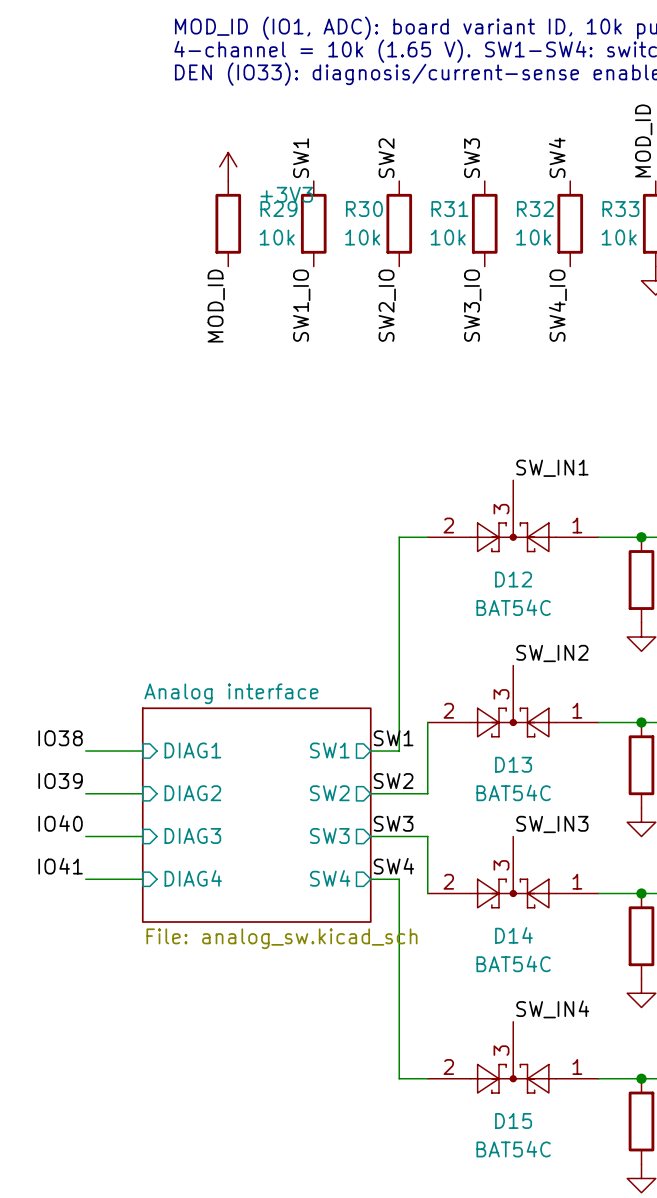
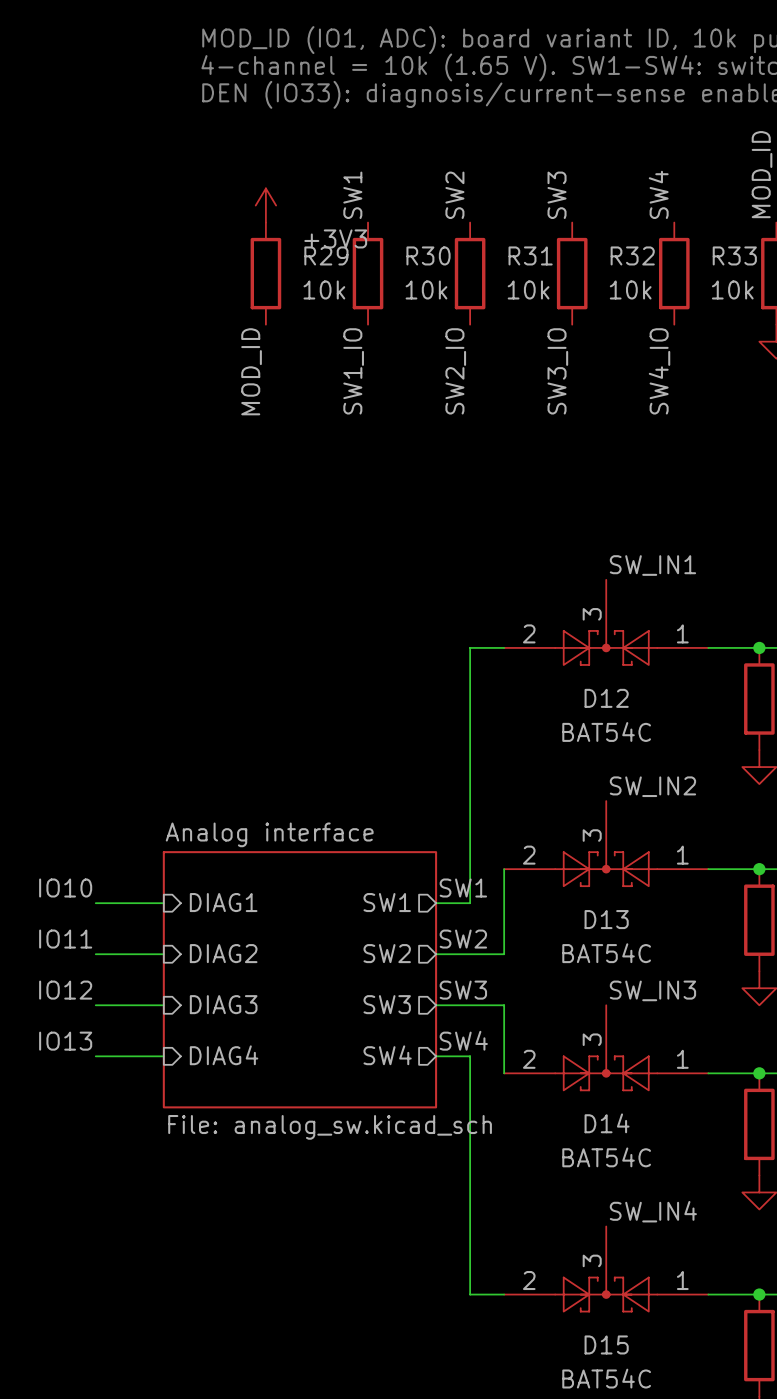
label: IO38 (60, 738) -> IO10 (65, 888)
label: IO39 (60, 781) -> IO11 (65, 939)
label: IO40 (60, 823) -> IO12 (65, 990)
label: IO41 (60, 866) -> IO13 (65, 1041)

